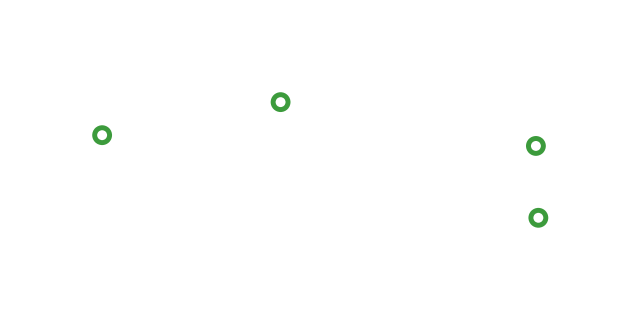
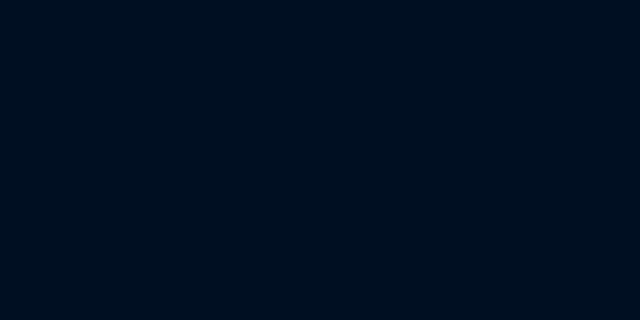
via: (280, 102) -> none
via: (102, 135) -> none
via: (535, 145) -> none
via: (538, 217) -> none

